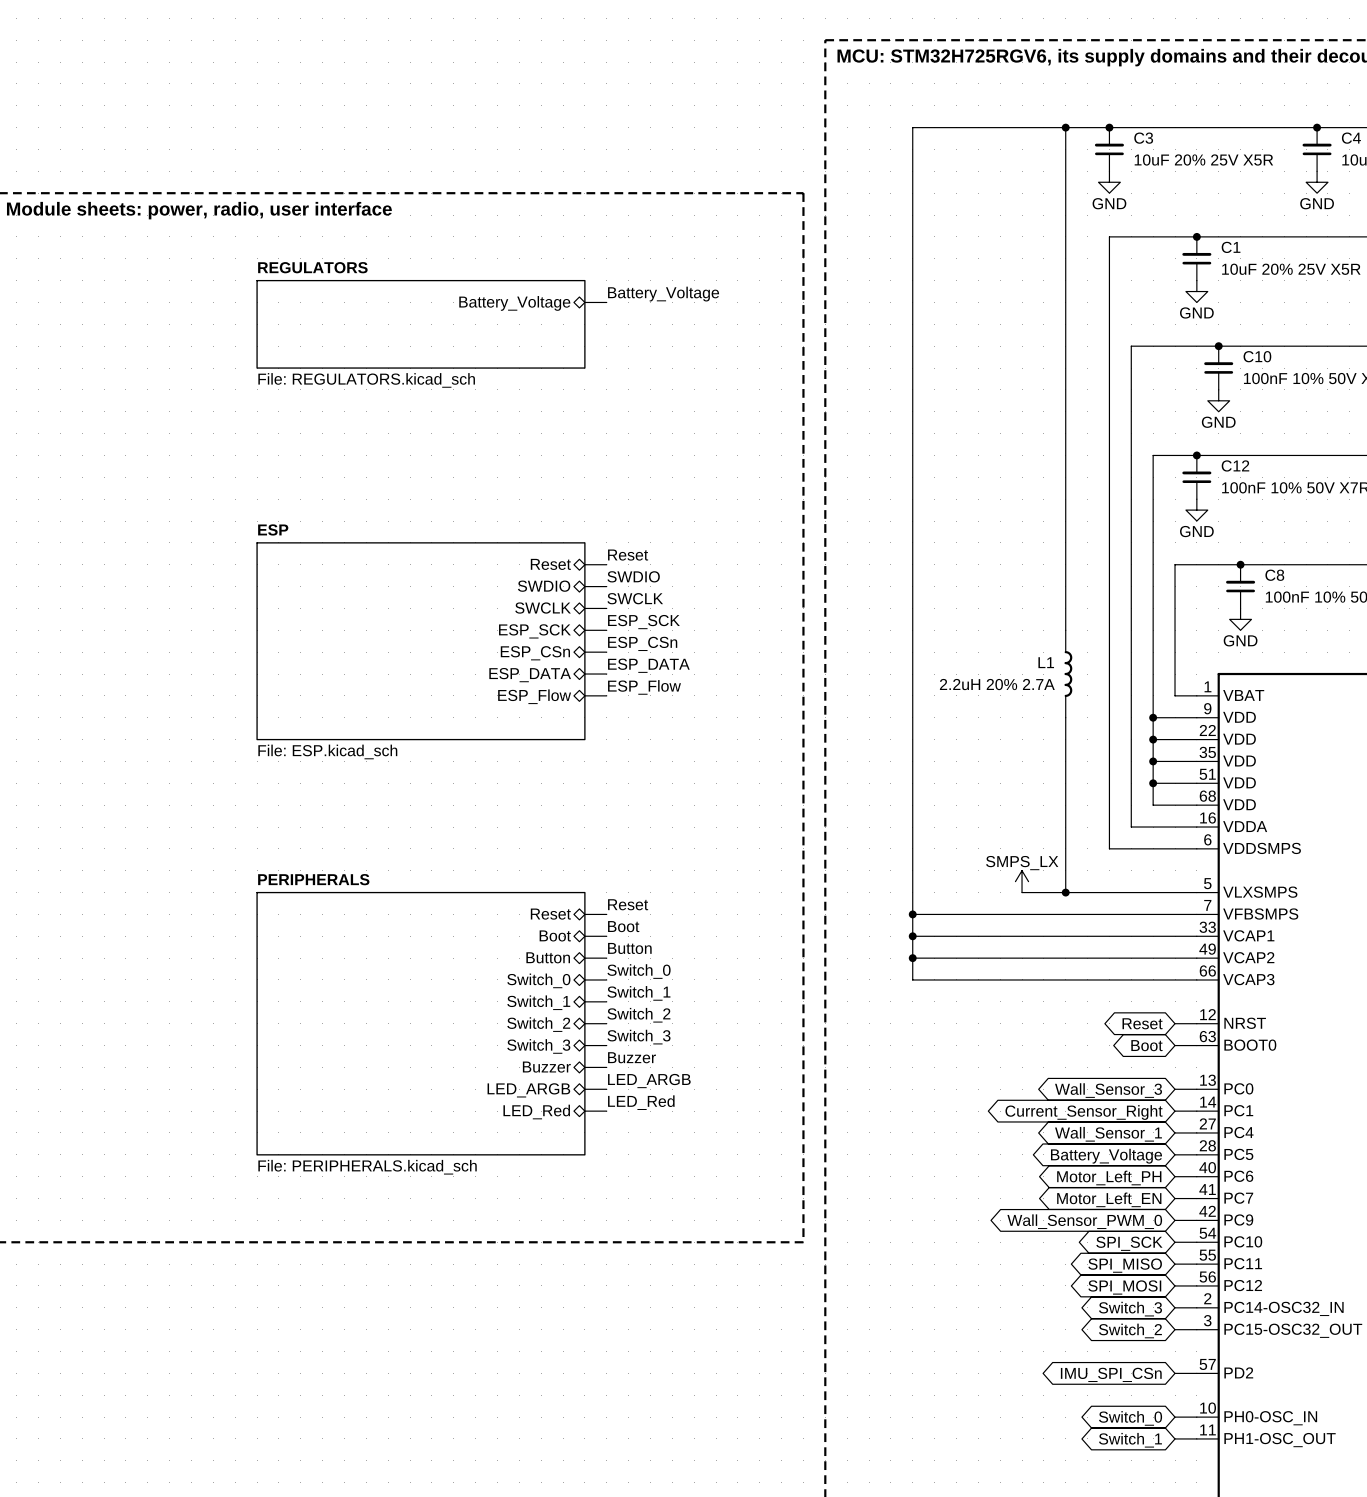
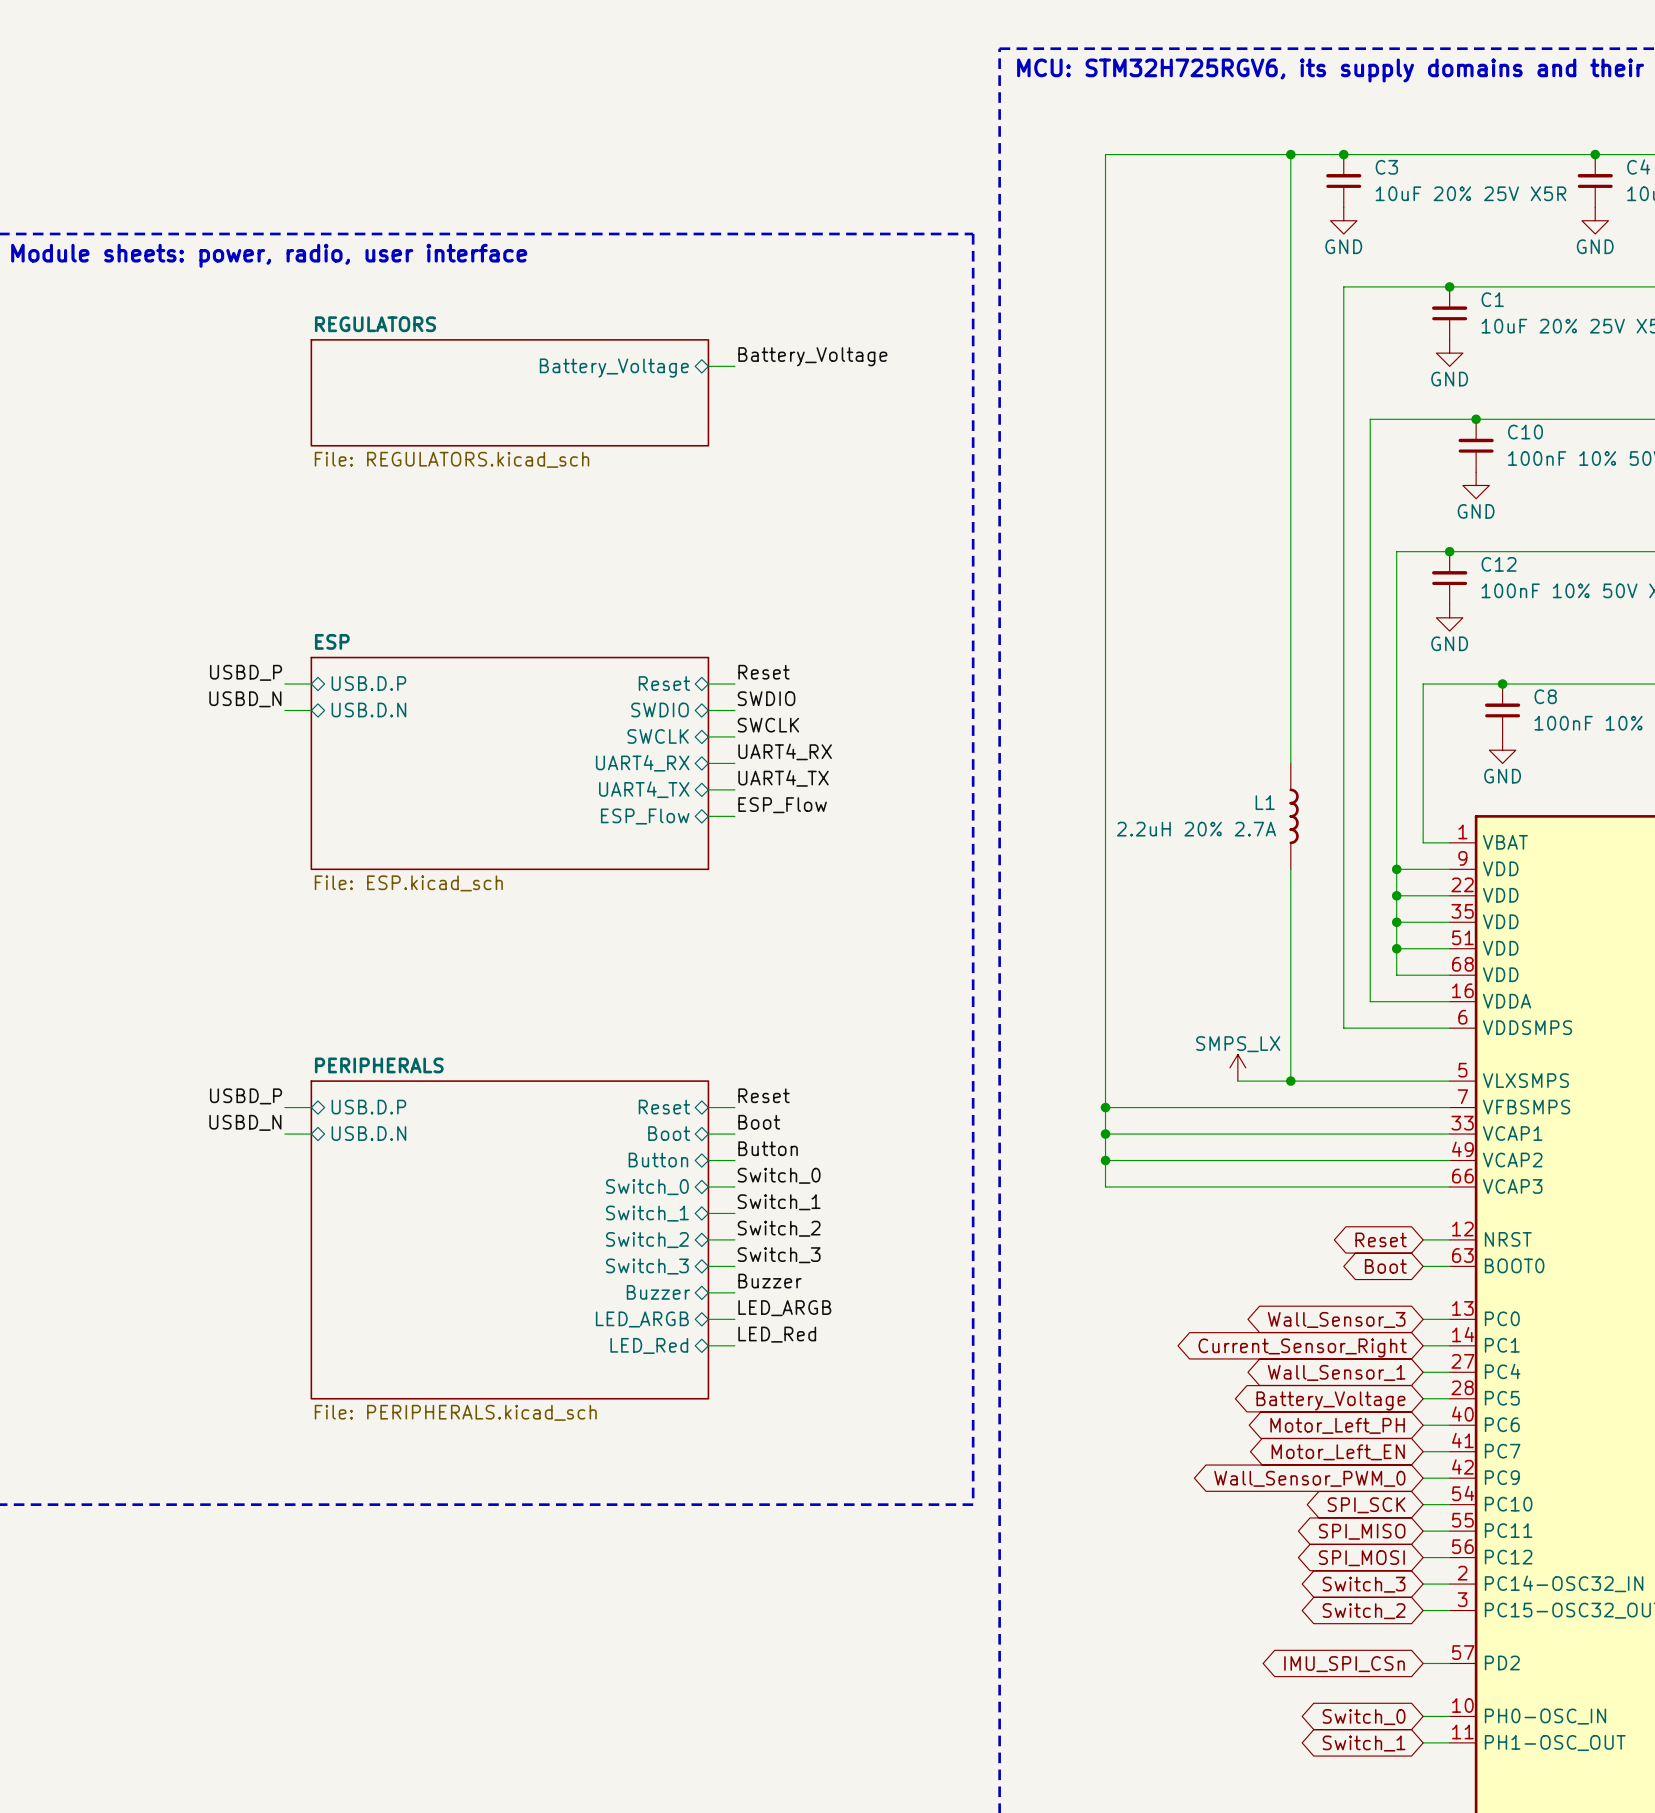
label: none -> USBD_P (246, 672)
wire: none -> (284, 684) (311, 684)
sheet pin: none -> USB.D.P (368, 683)
label: none -> USBD_N (245, 699)
wire: none -> (284, 710) (311, 710)
sheet pin: none -> USB.D.N (368, 709)
label: ESP_SCK (643, 622) -> UART4_RX (785, 751)
sheet ESP: none -> File: ESP.kicad_sch (509, 763)
sheet pin: ESP_SCK (534, 631) -> UART4_RX (642, 763)
sheet ESP: File: ESP.kicad_sch (420, 641) -> none
label: ESP_CSn (642, 643) -> UART4_TX (783, 778)
sheet pin: ESP_CSn (535, 653) -> UART4_TX (644, 789)
label: ESP_DATA (648, 665) -> ESP_Flow (782, 805)
sheet pin: ESP_DATA (530, 675) -> ESP_Flow (645, 816)
label: ESP_Flow (644, 687) -> none
wire: (584, 695) (606, 695) -> none
sheet pin: ESP_Flow (534, 696) -> none
label: none -> USBD_P (246, 1096)
wire: none -> (284, 1107) (311, 1107)
sheet pin: none -> USB.D.P (368, 1107)
label: none -> USBD_N (245, 1122)
sheet pin: none -> USB.D.N (368, 1133)
wire: none -> (284, 1134) (311, 1134)

